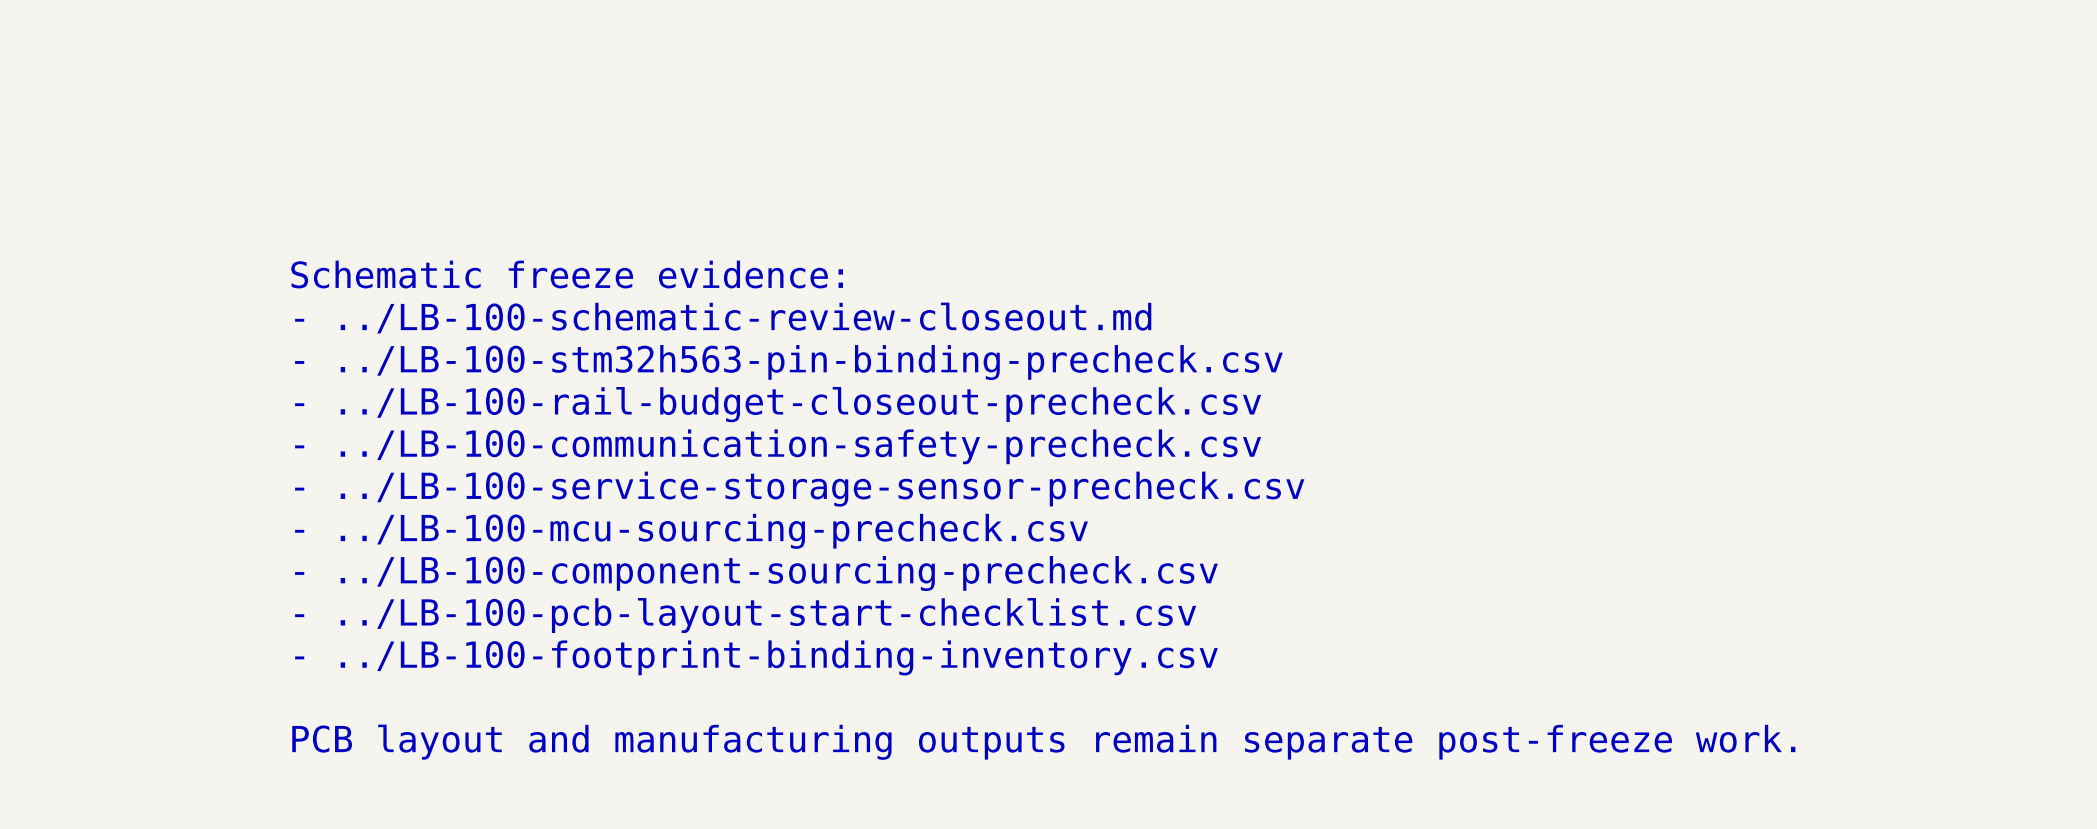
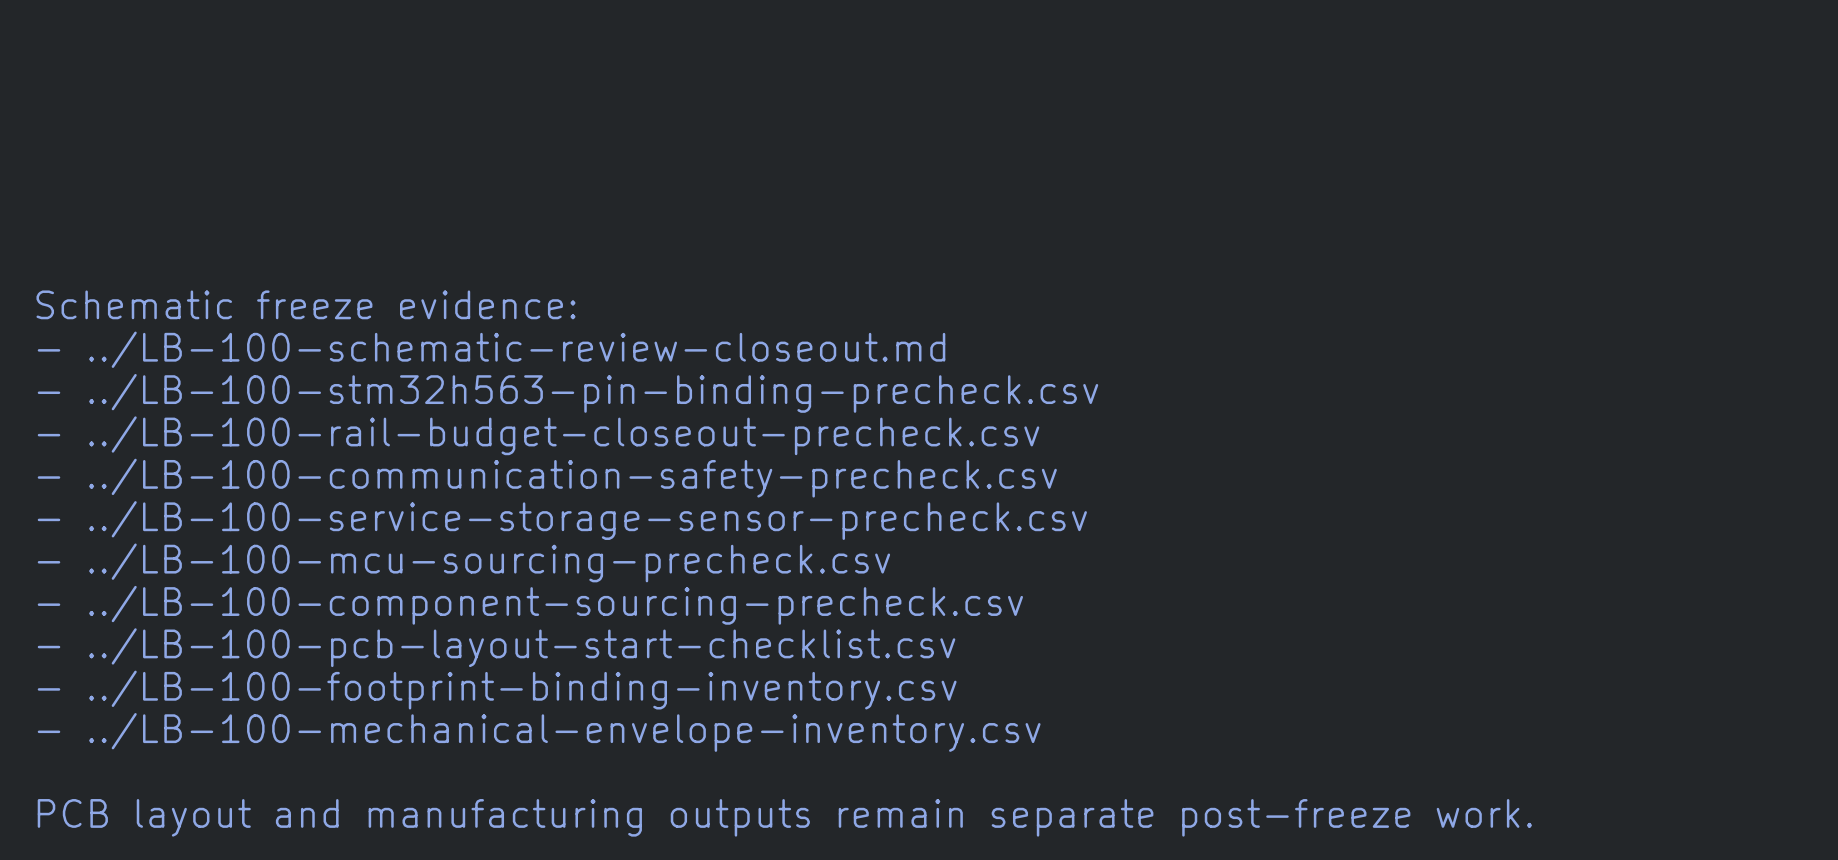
text: none -> - ../LB-100-mechanical-envelope-inventory.csv (539, 732)
text position: PCB layout and manufacturing outputs remain separate post-freeze work. (1043, 742) -> PCB layout and manufacturing outputs remain separate post-freeze work. (784, 817)

